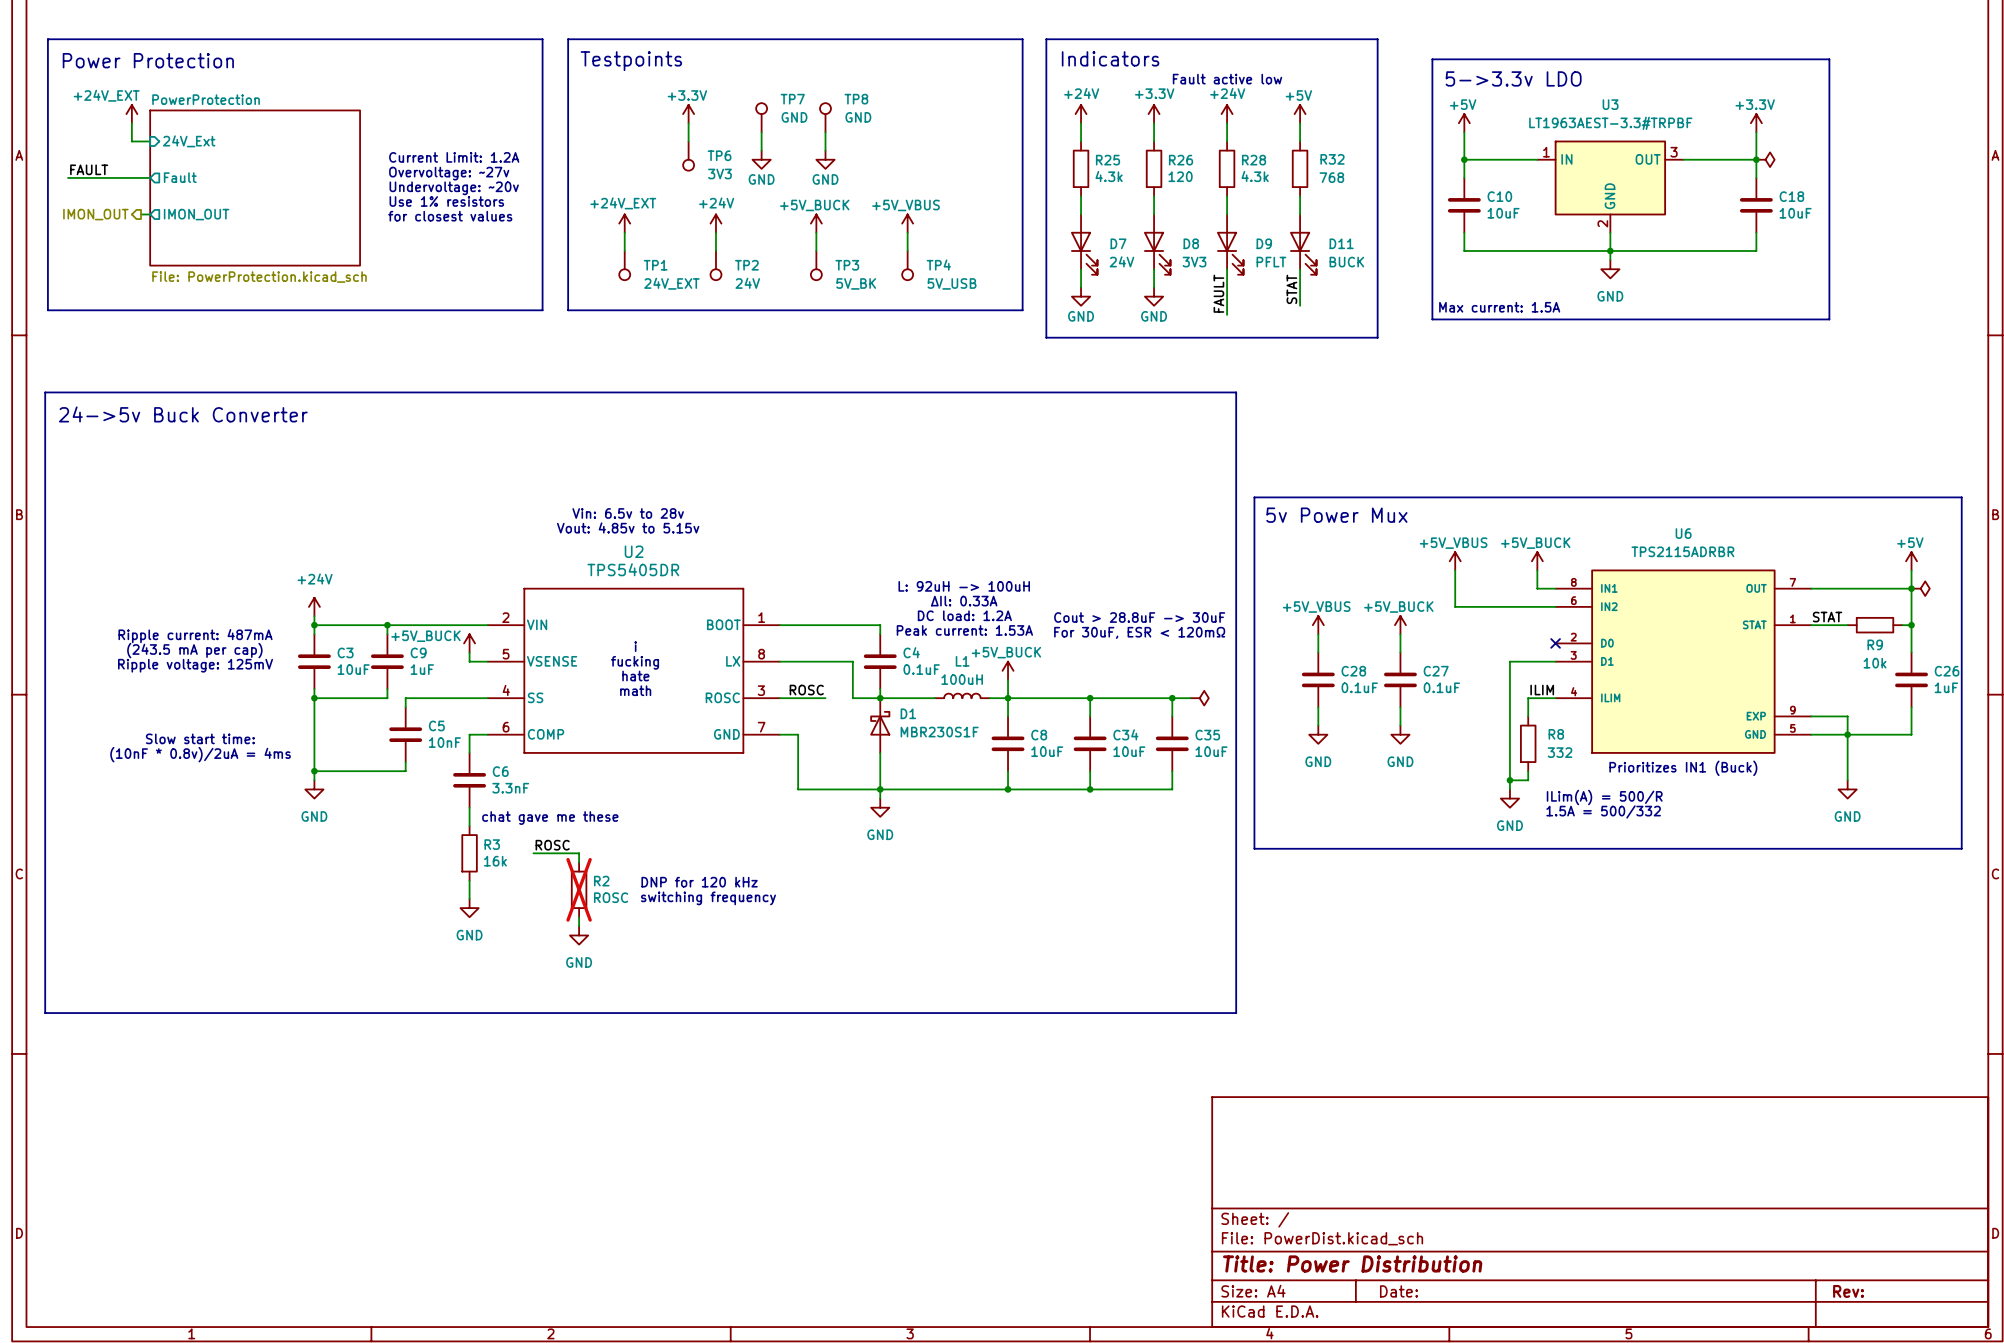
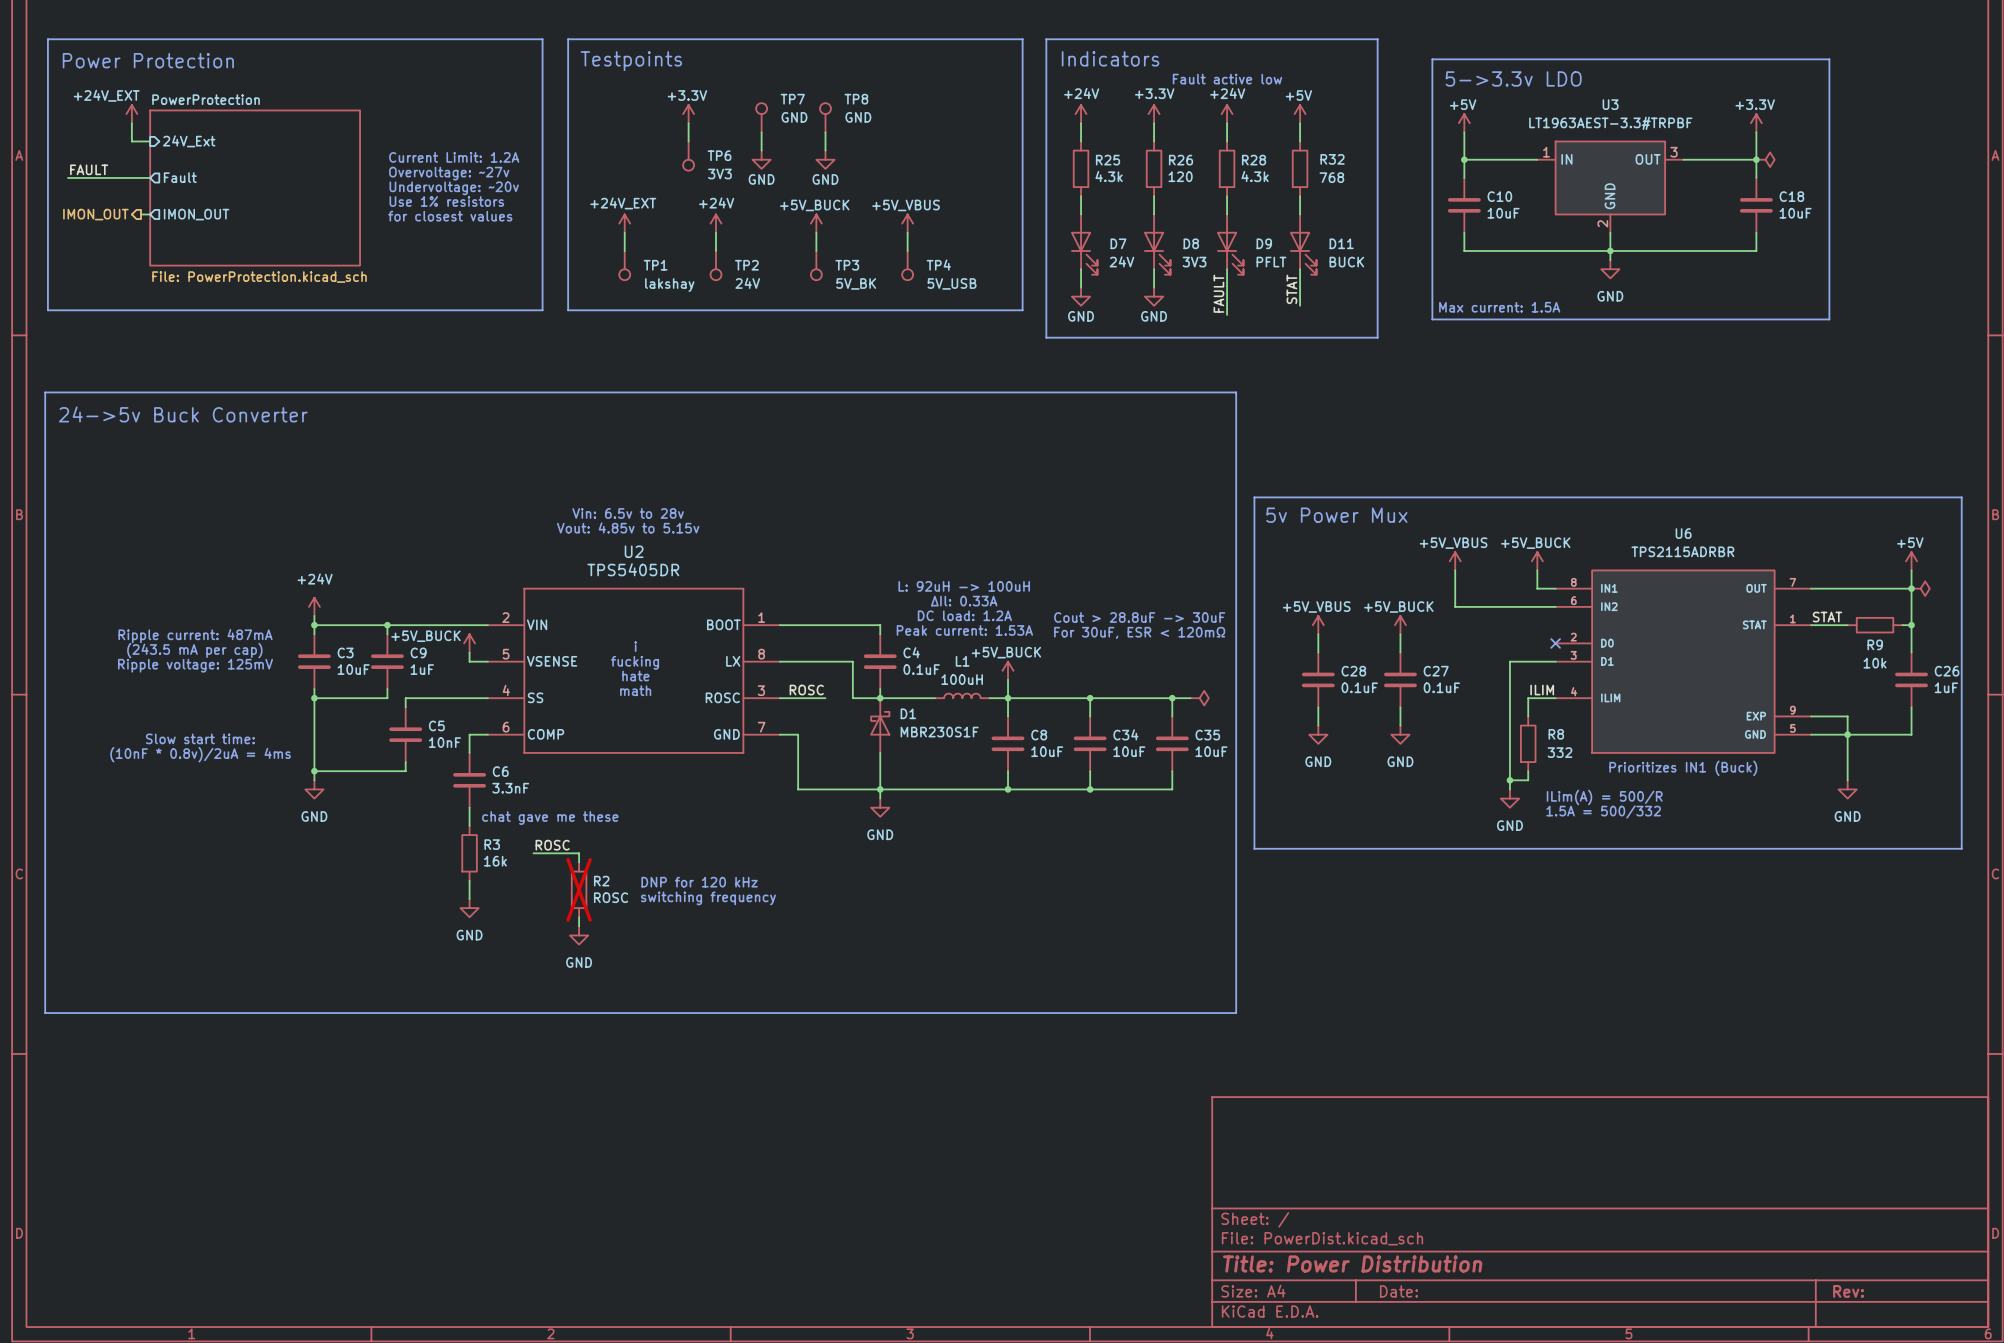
TP1 value: 24V_EXT (671, 283) -> lakshay (669, 285)

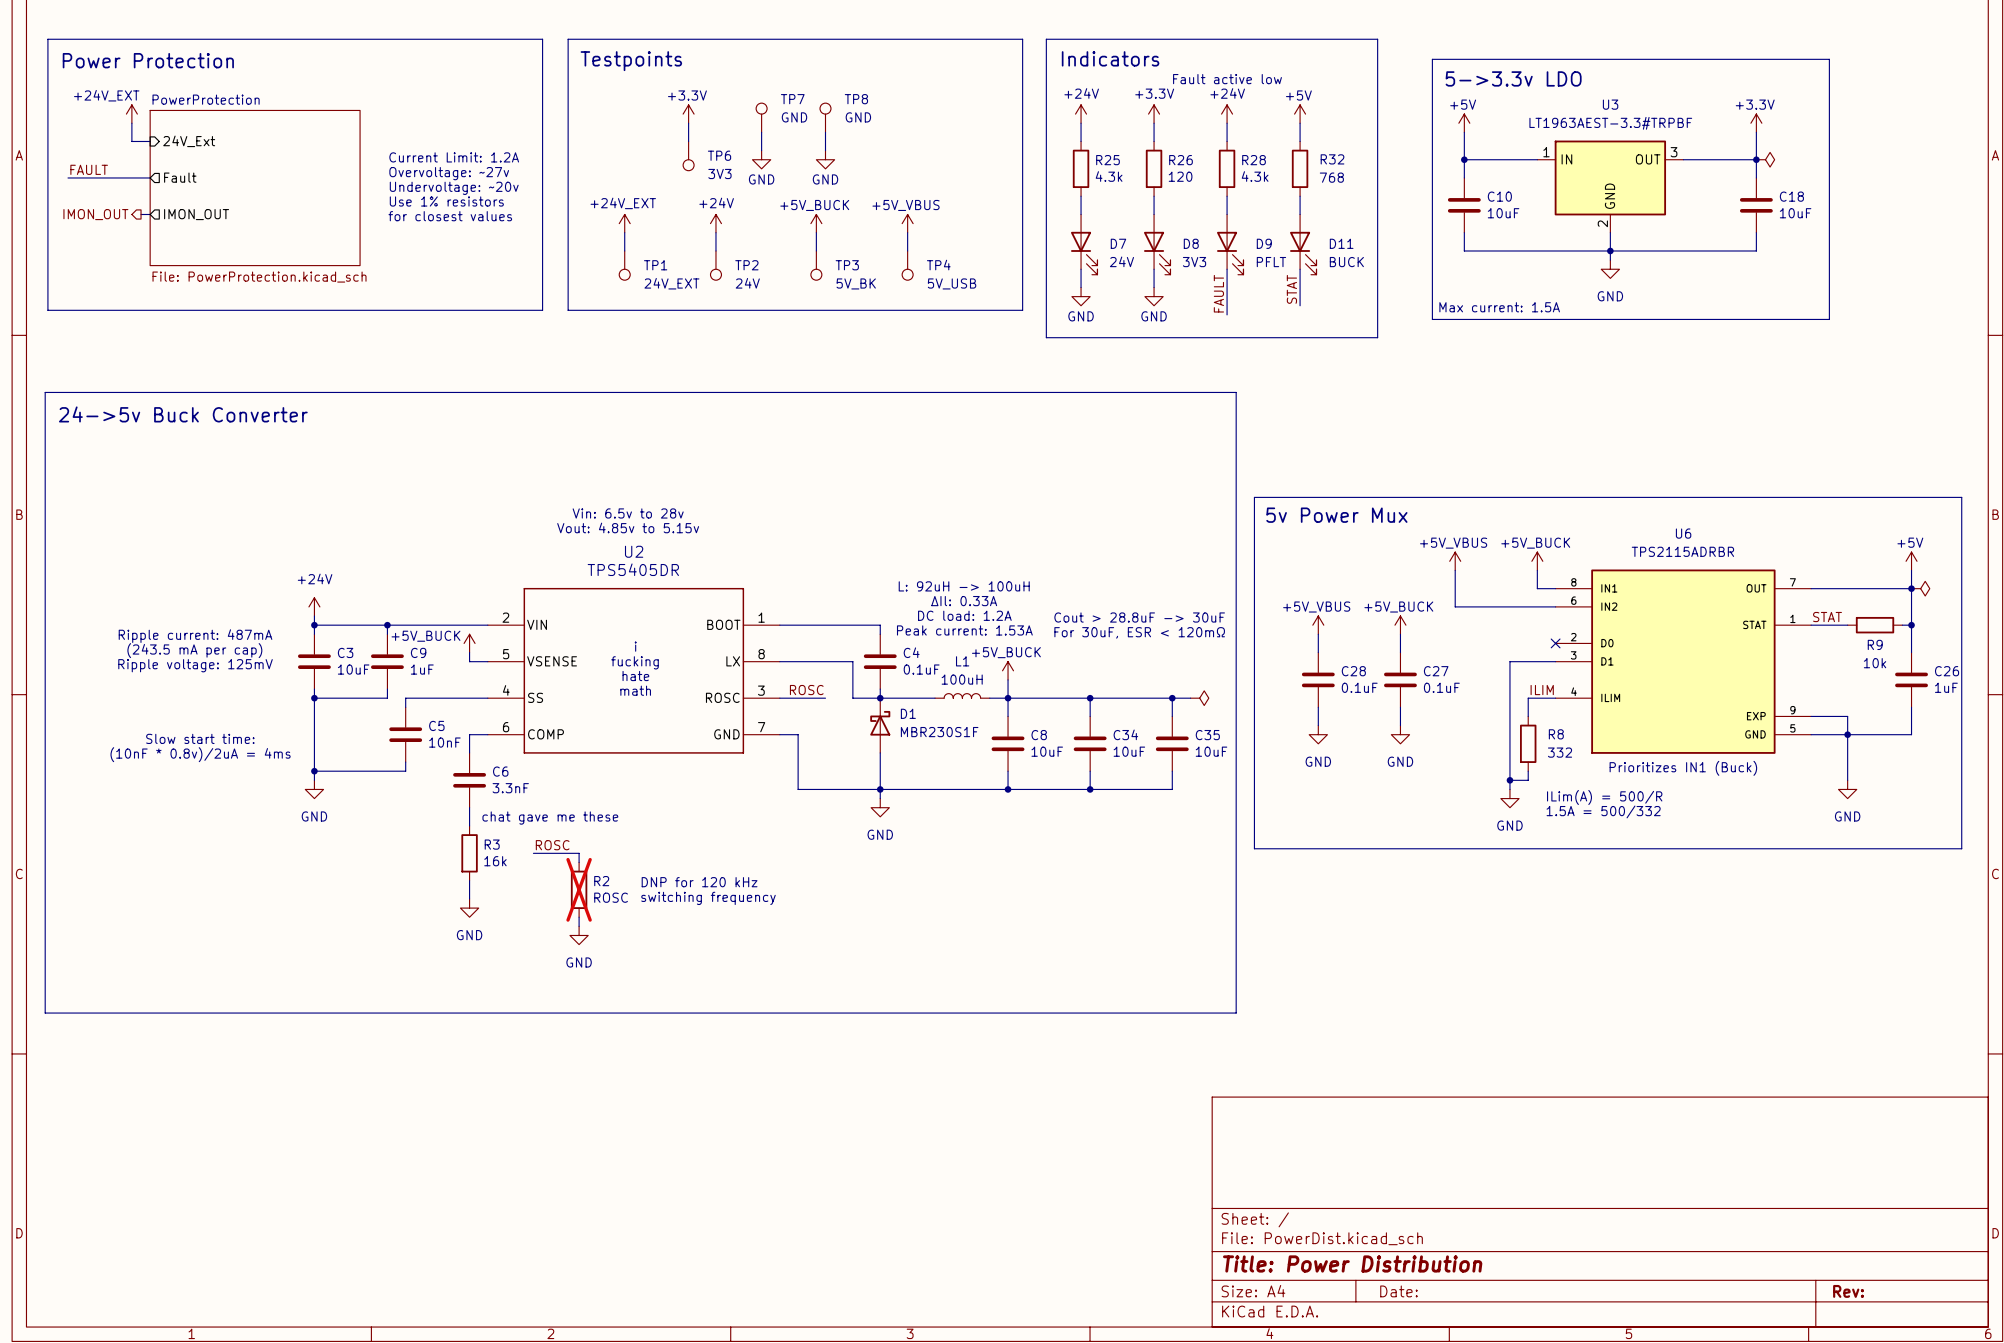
TP1 value: lakshay (669, 285) -> 24V_EXT (671, 283)

